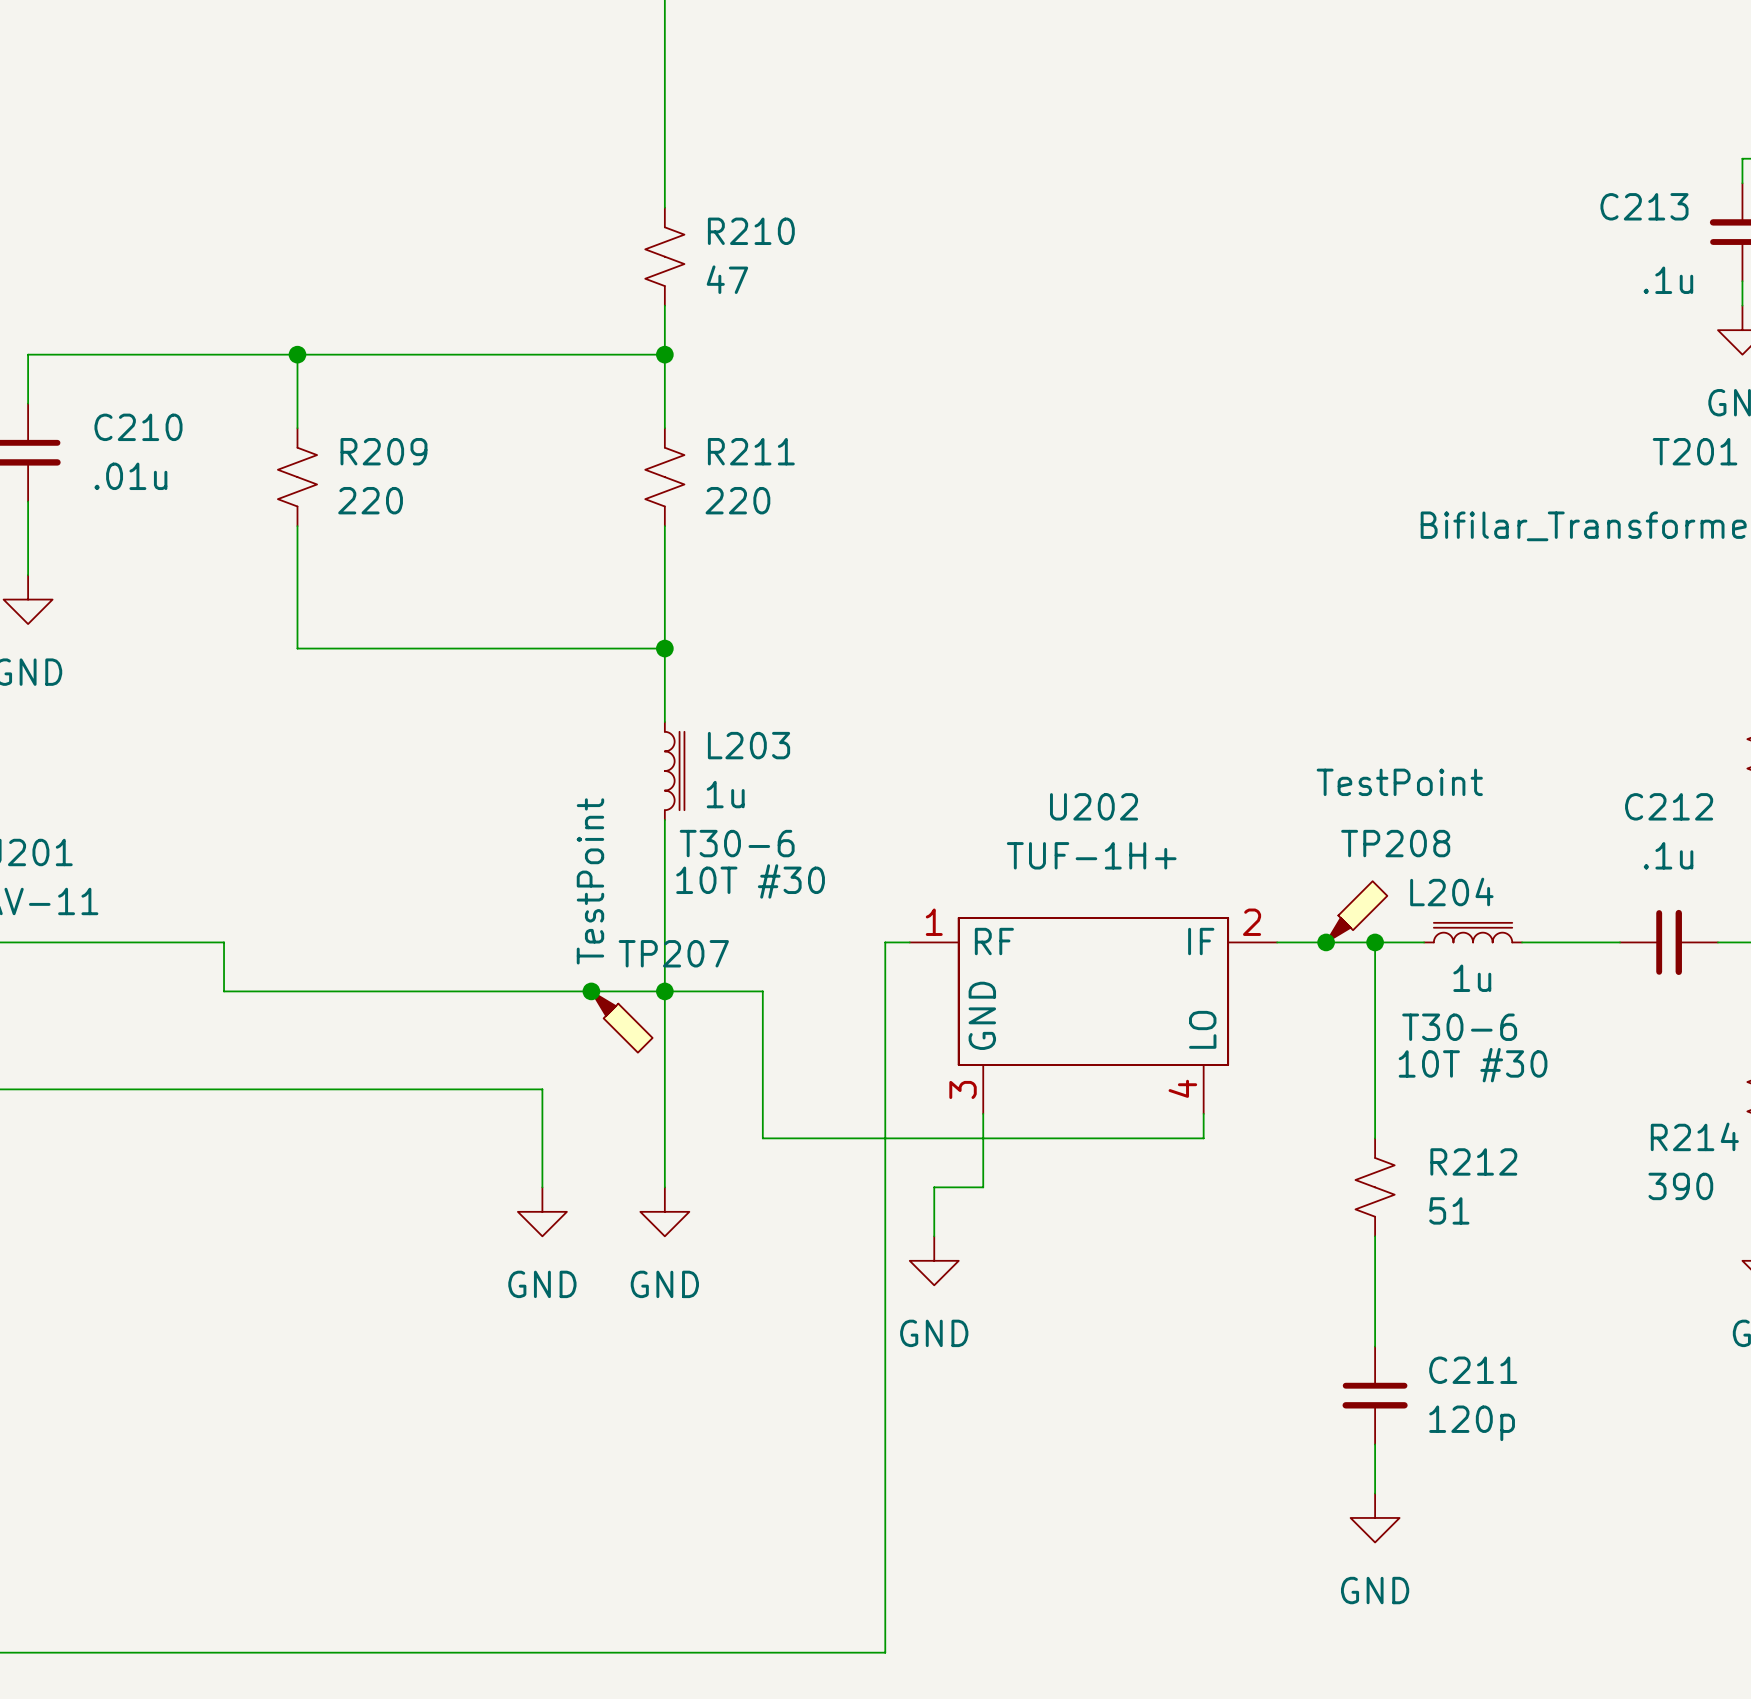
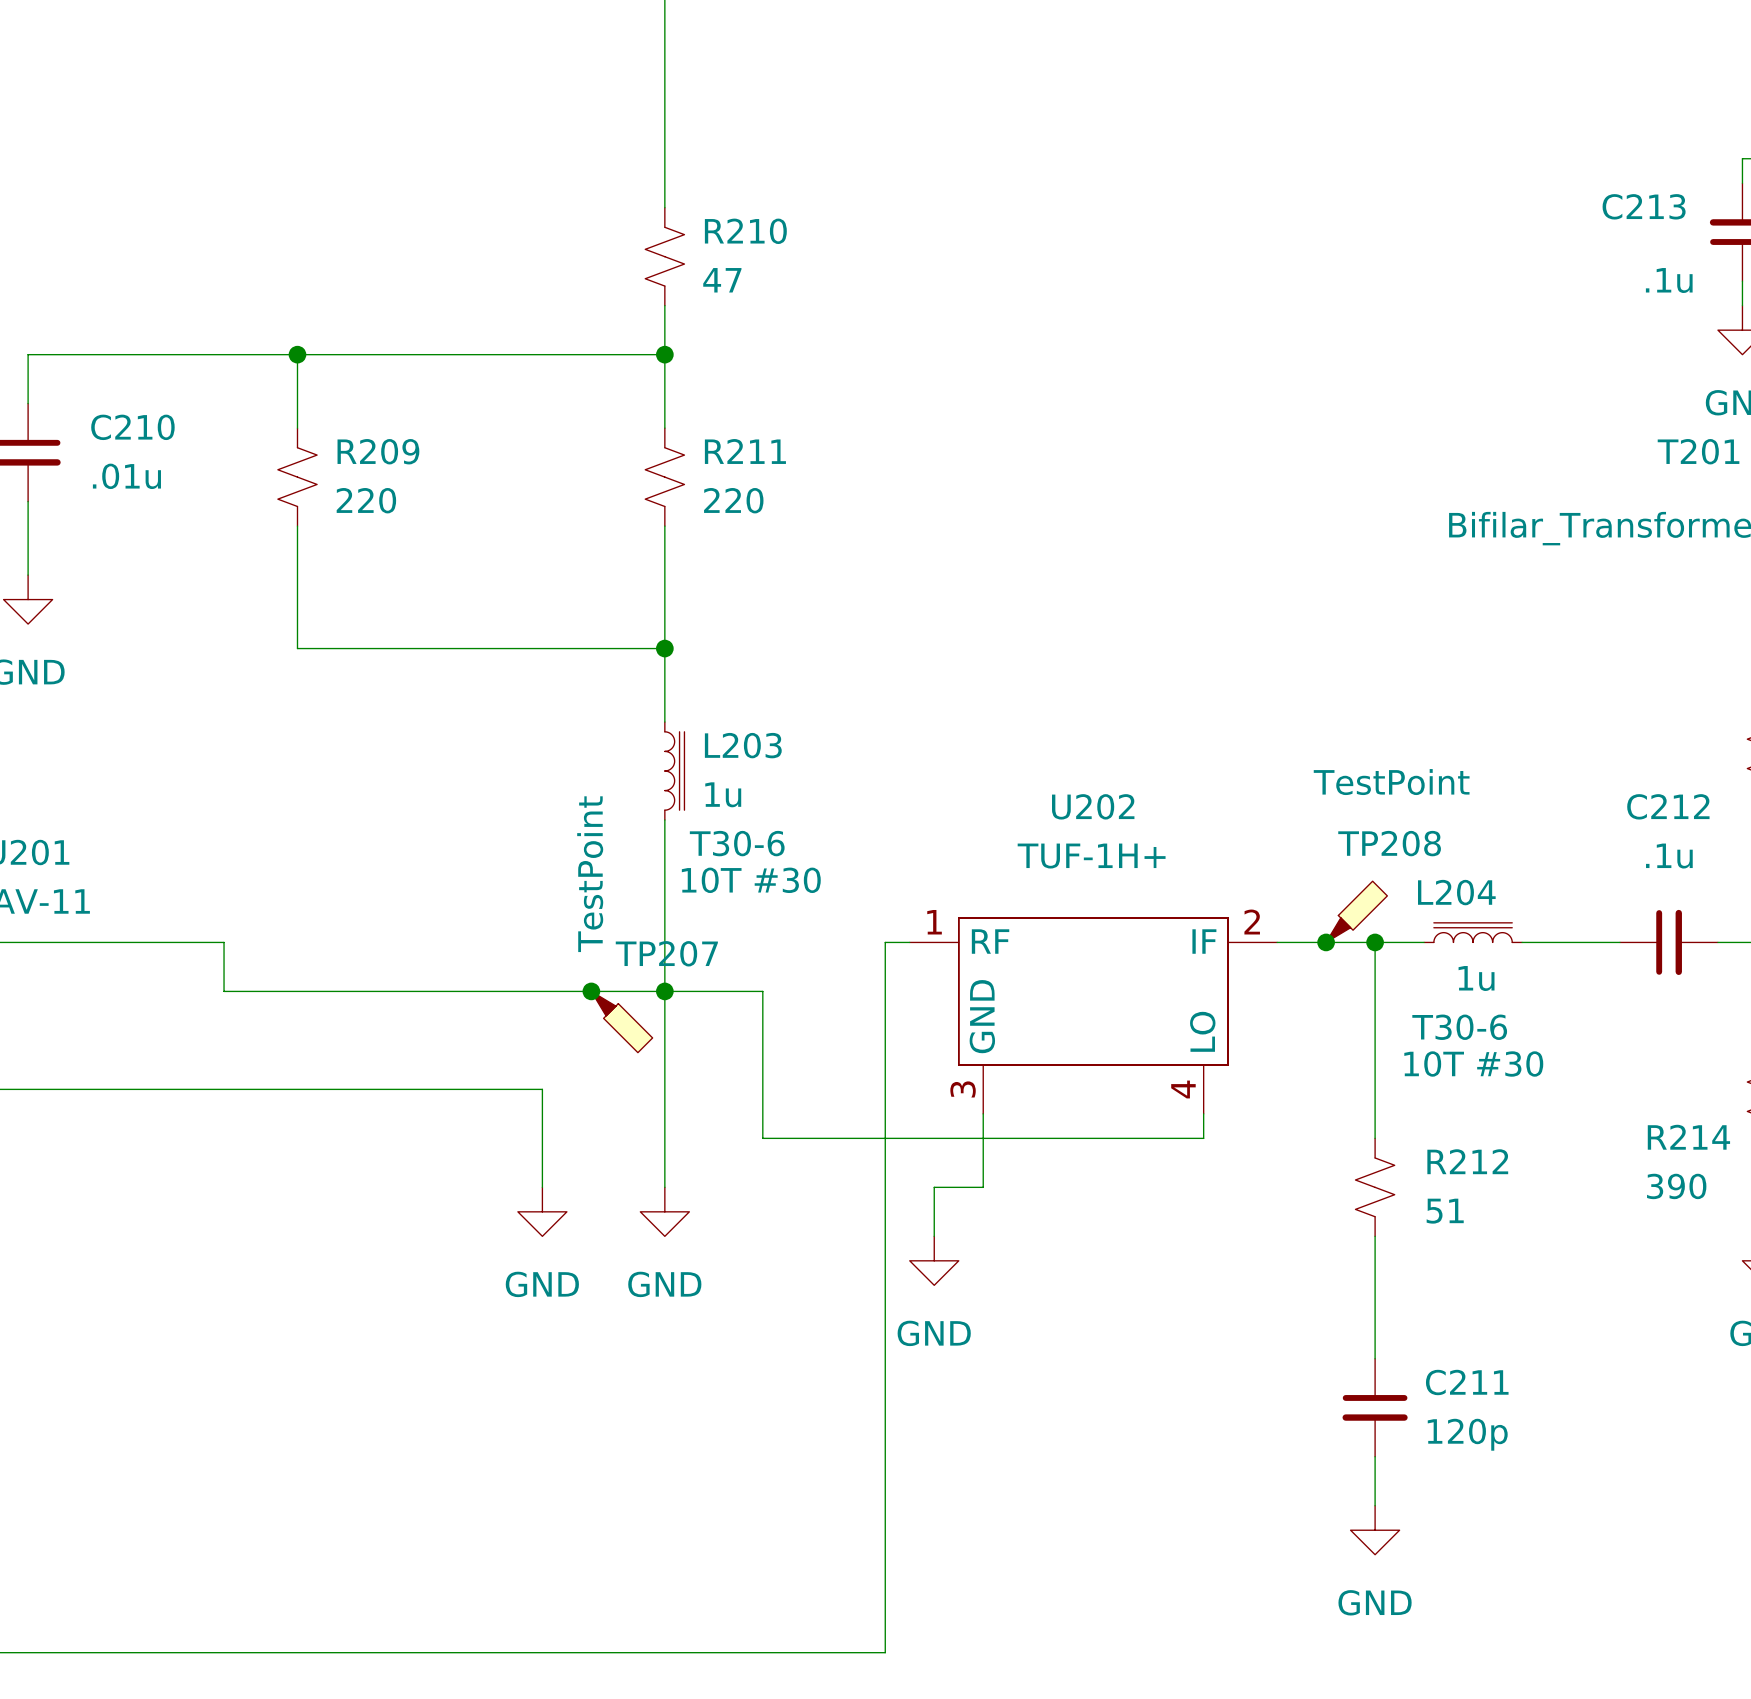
C211 position: (1375, 1395) -> (1375, 1407)
power symbol position: GND (1375, 1517) -> GND (1375, 1530)

